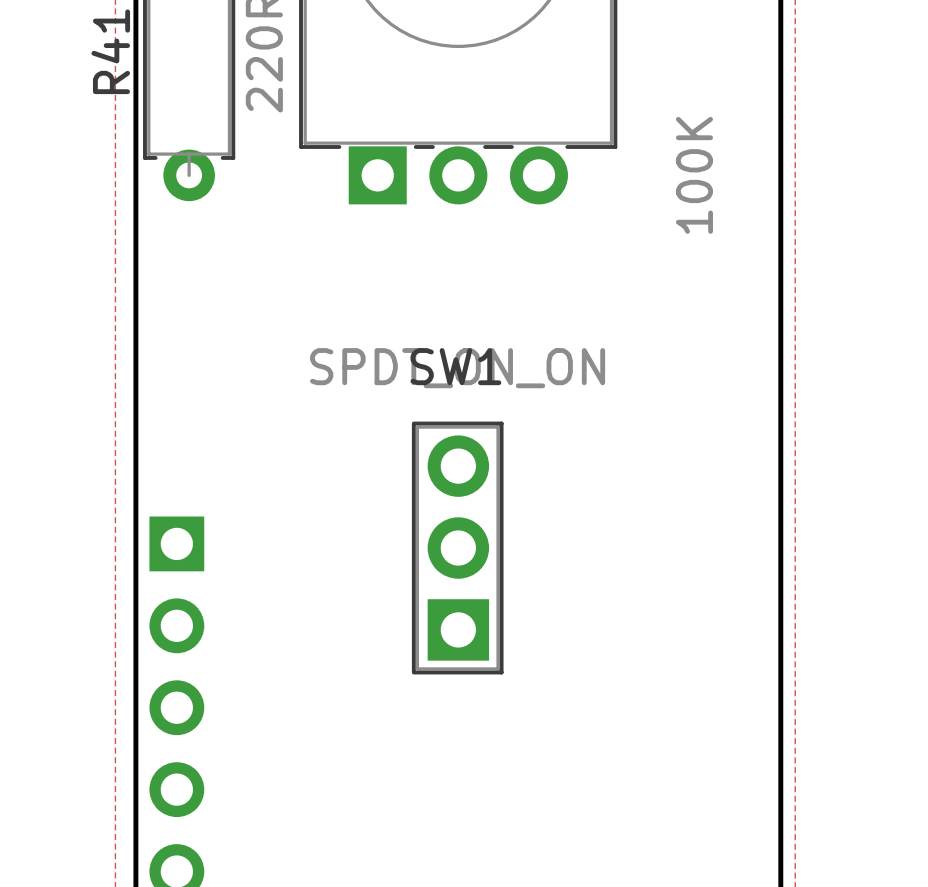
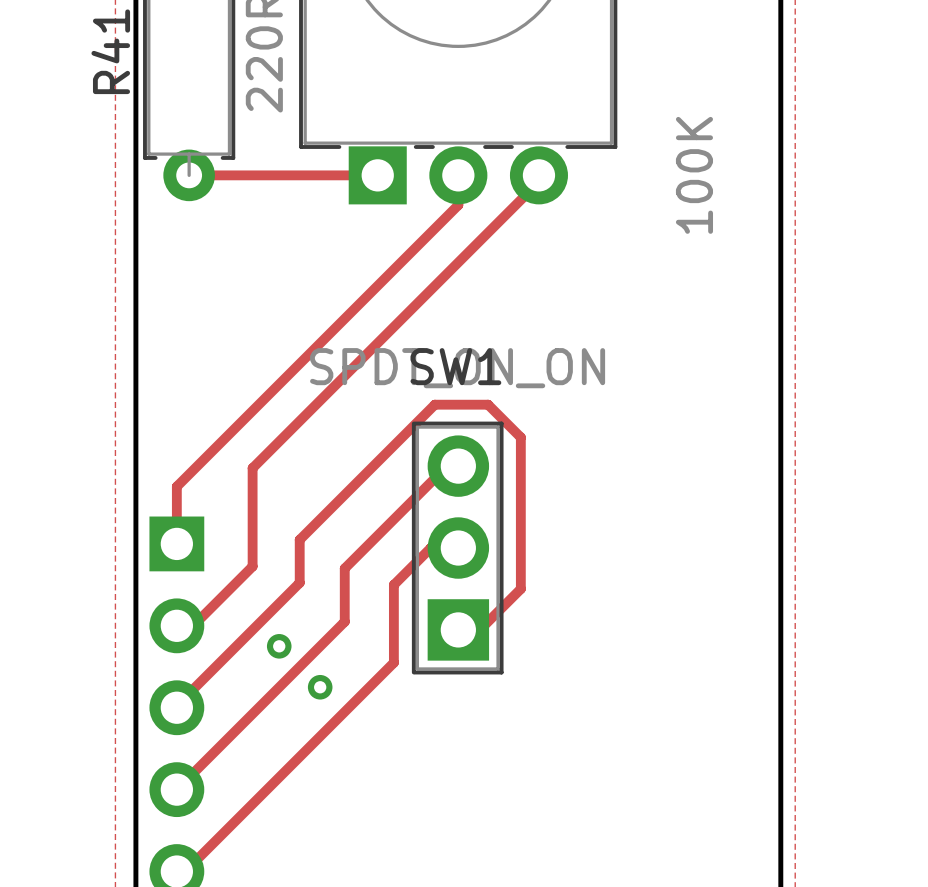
track: none -> (189, 175) (377, 175)
track: none -> (458, 175) (458, 205) (176, 486) (176, 543)
track: none -> (538, 175) (538, 181) (252, 468) (252, 566) (193, 625) (176, 625)
track: none -> (458, 466) (447, 466) (344, 568) (344, 621) (176, 789)
track: none -> (458, 548) (430, 548) (393, 584) (393, 662) (185, 871) (176, 871)
track: none -> (458, 629) (479, 629) (520, 588) (520, 437) (488, 404) (434, 404) (299, 539) (299, 582) (176, 707)
via: none -> (279, 646)
via: none -> (320, 687)

